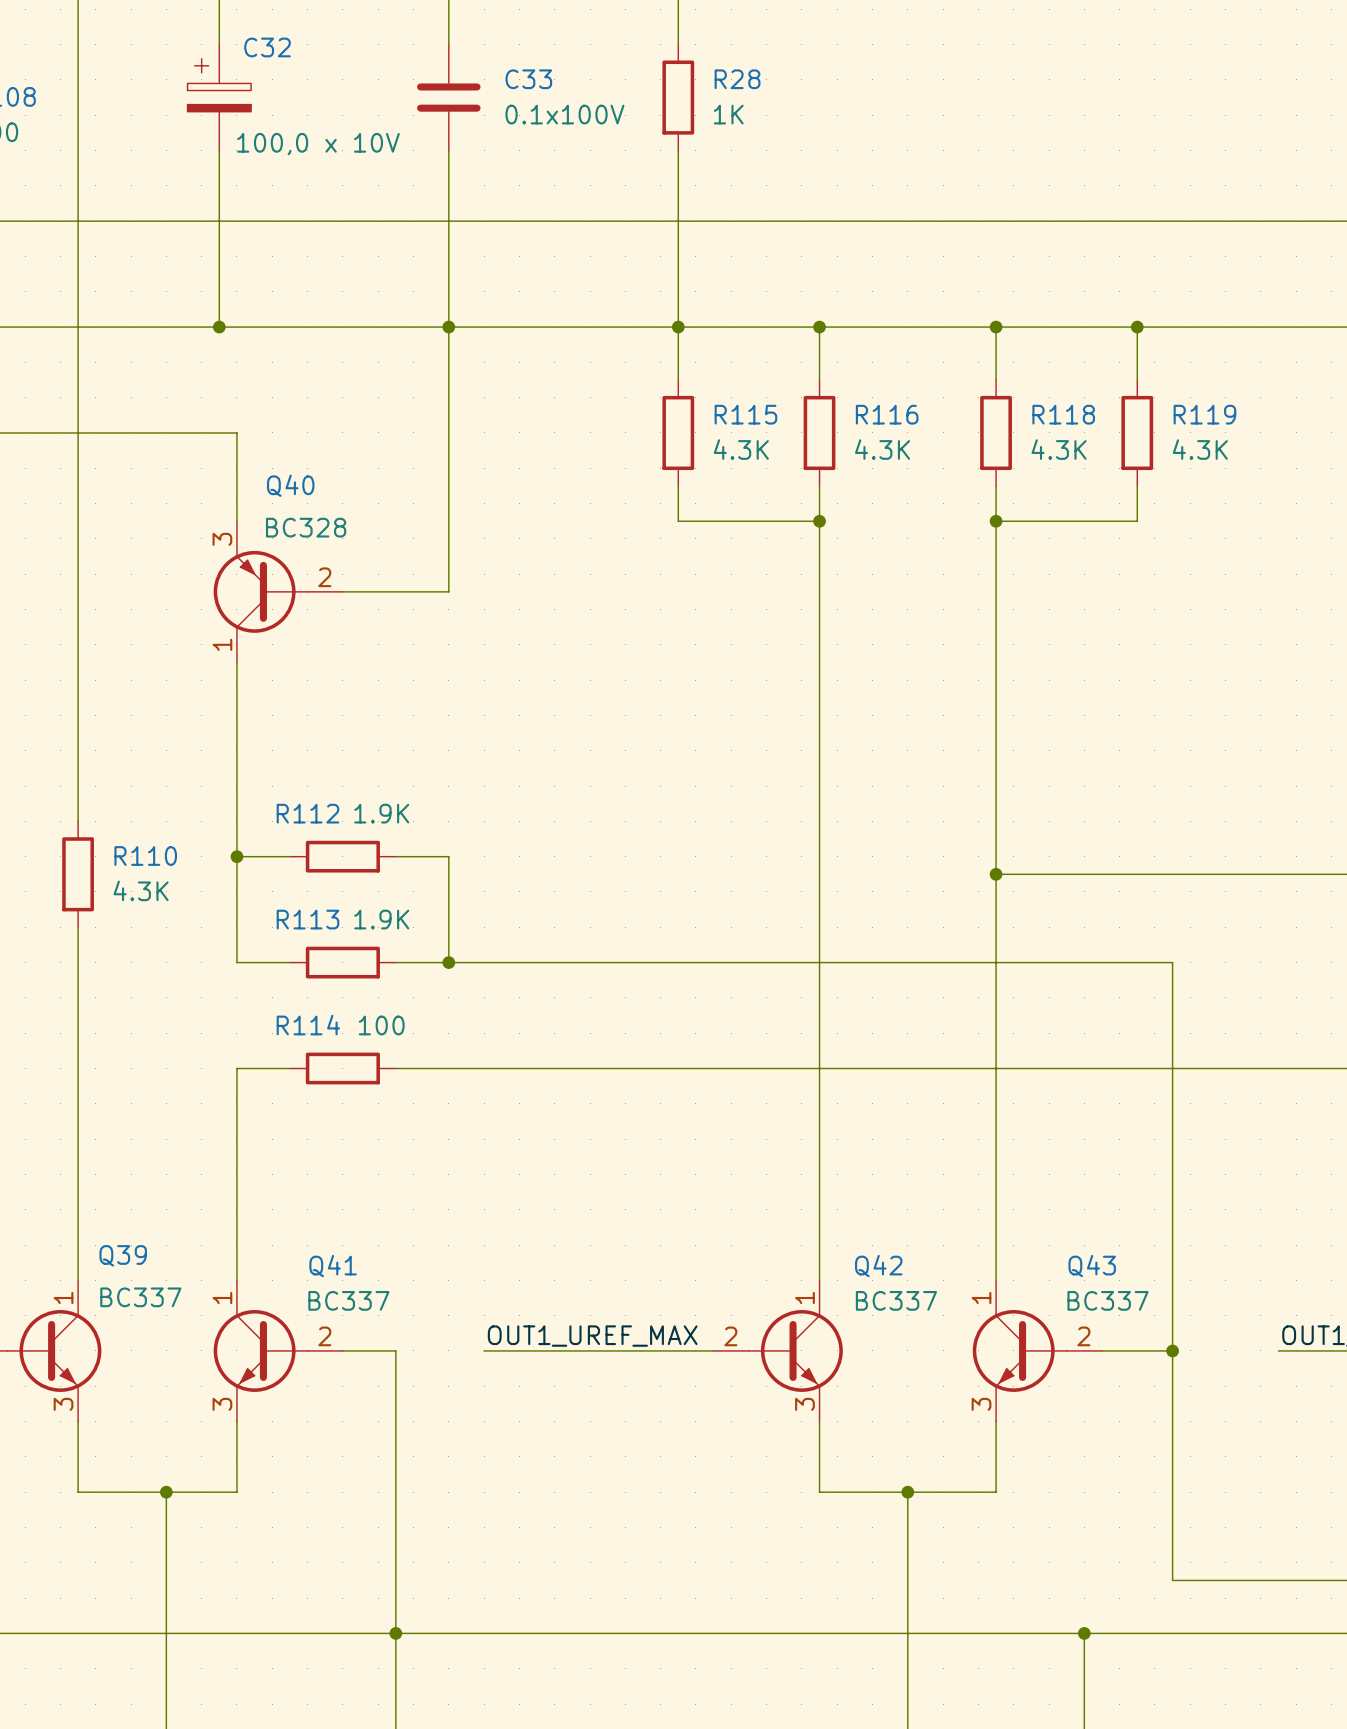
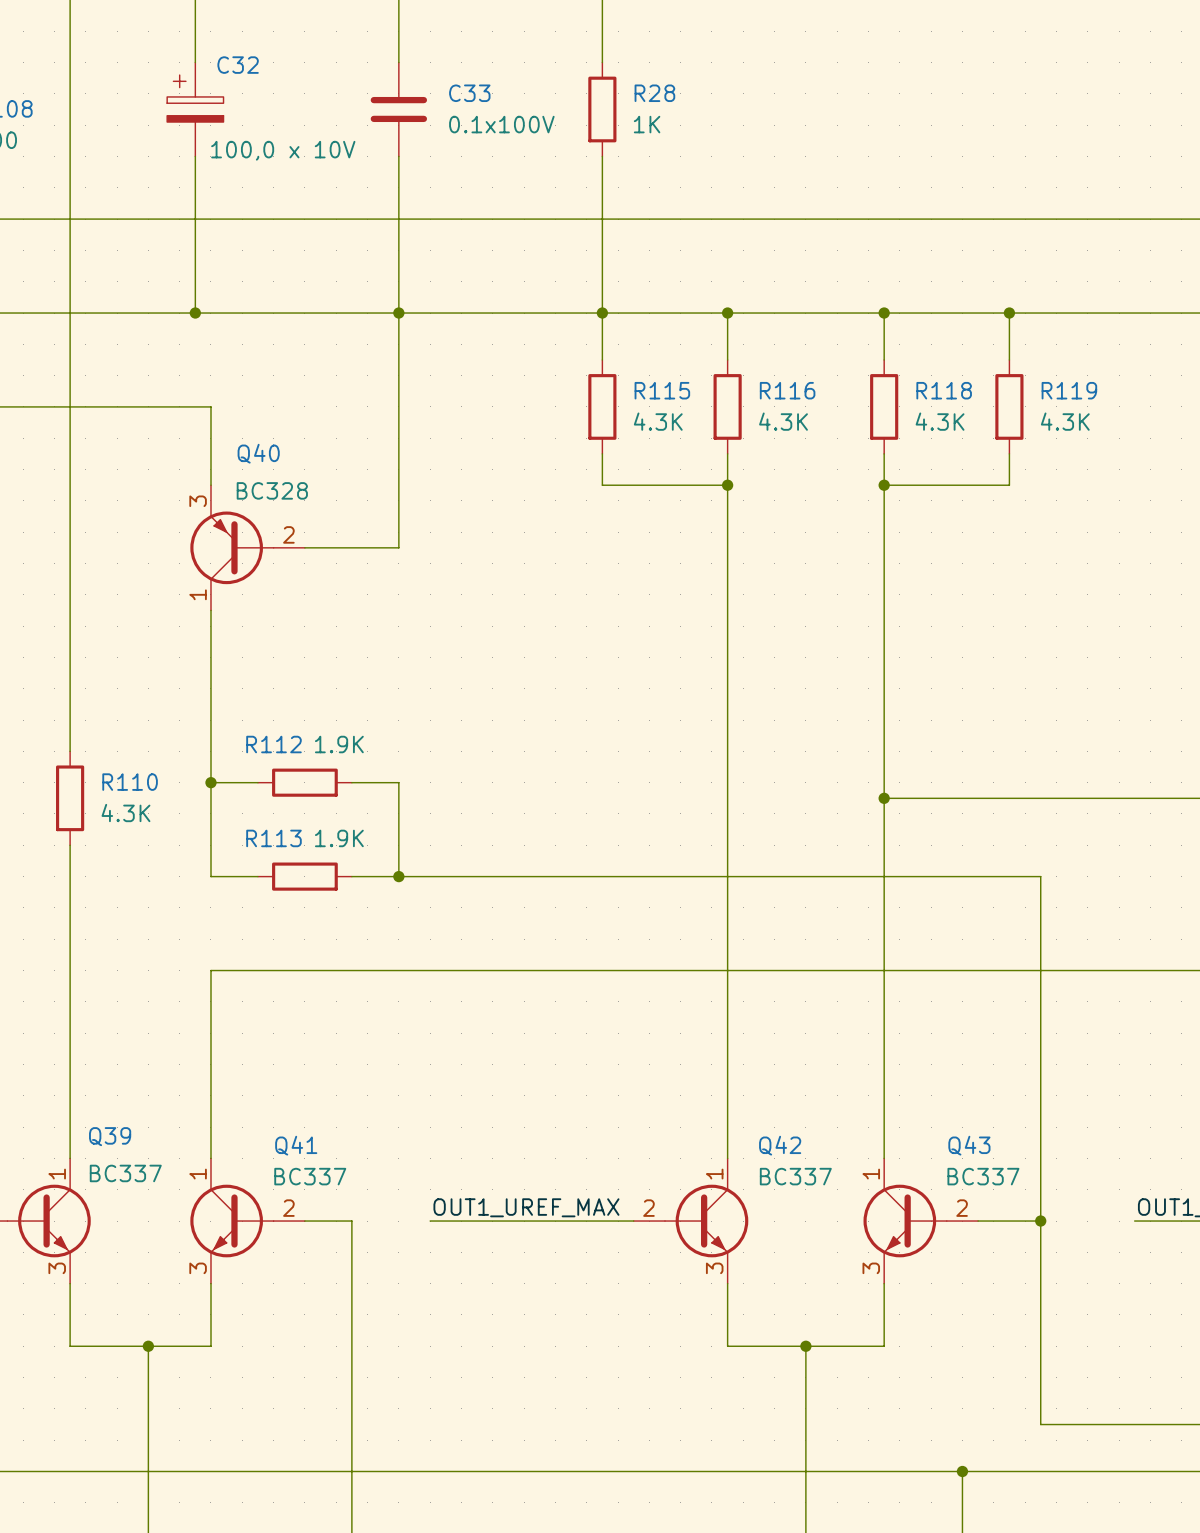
wire: none -> (257, 970) (351, 970)
R114: 100 (342, 1068) -> none
junction: (395, 1633) -> none

